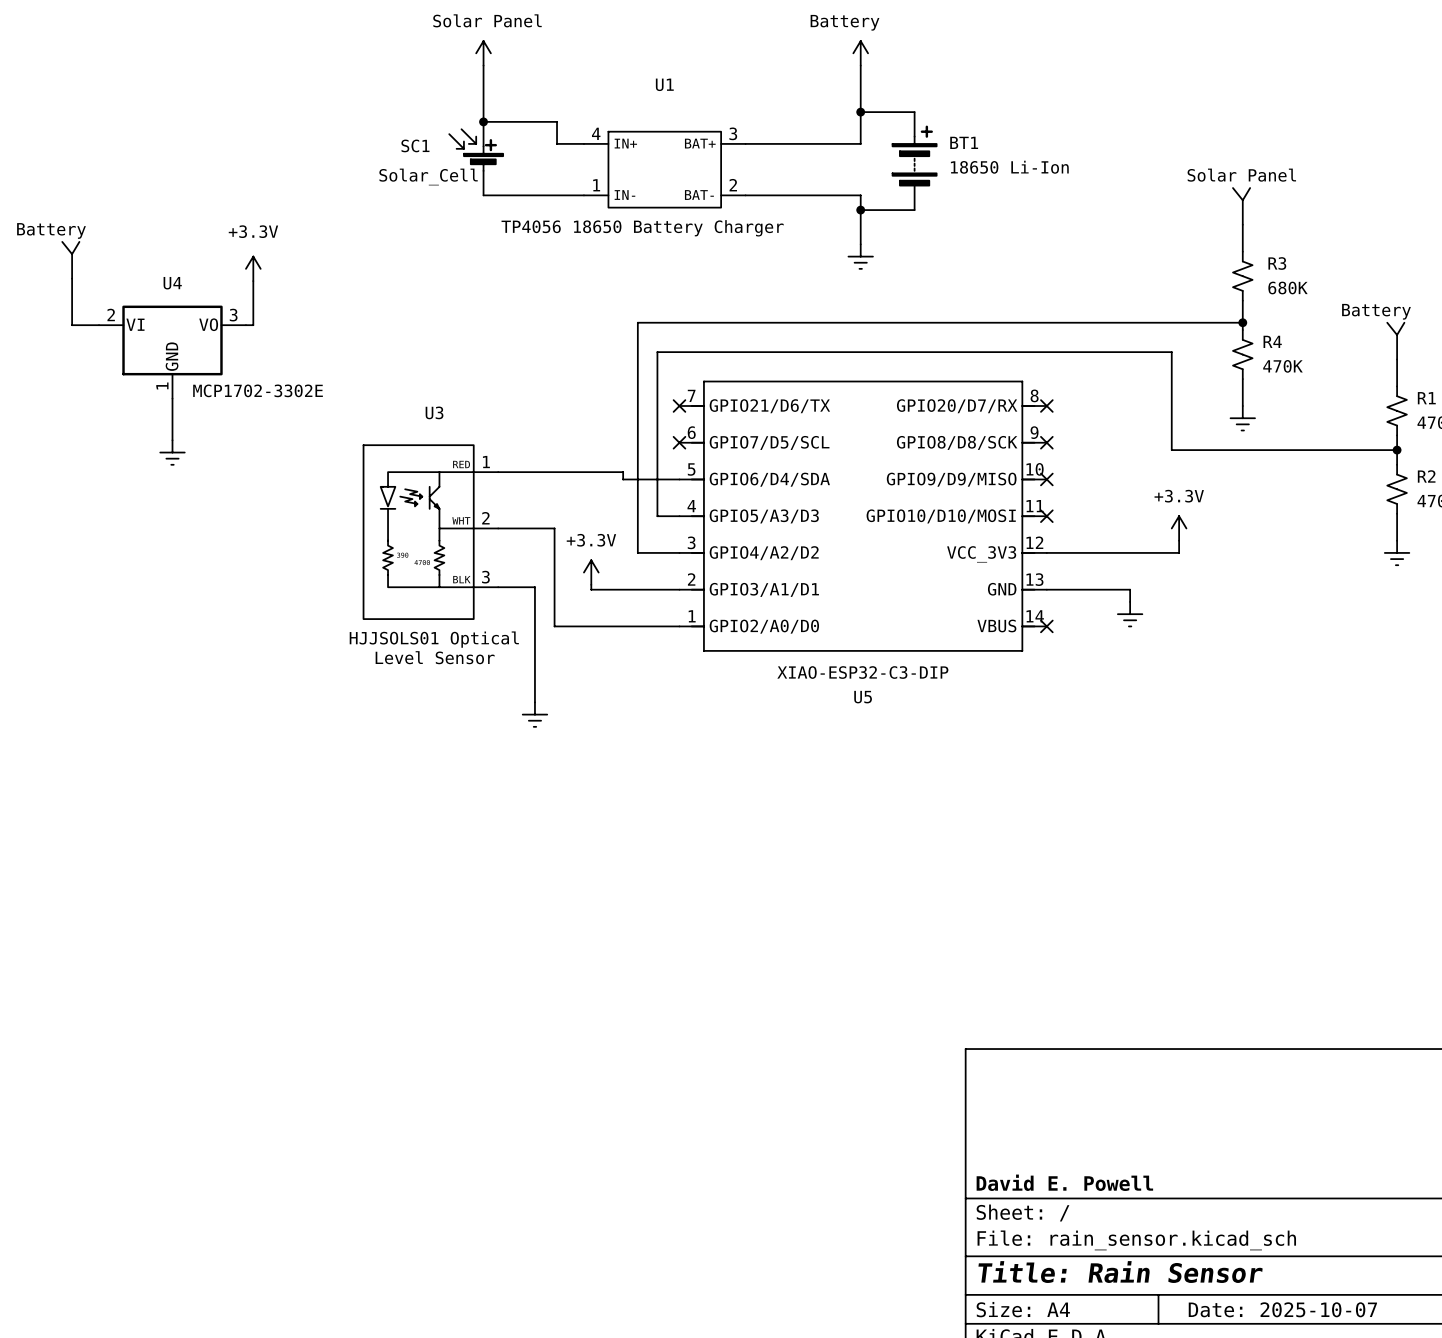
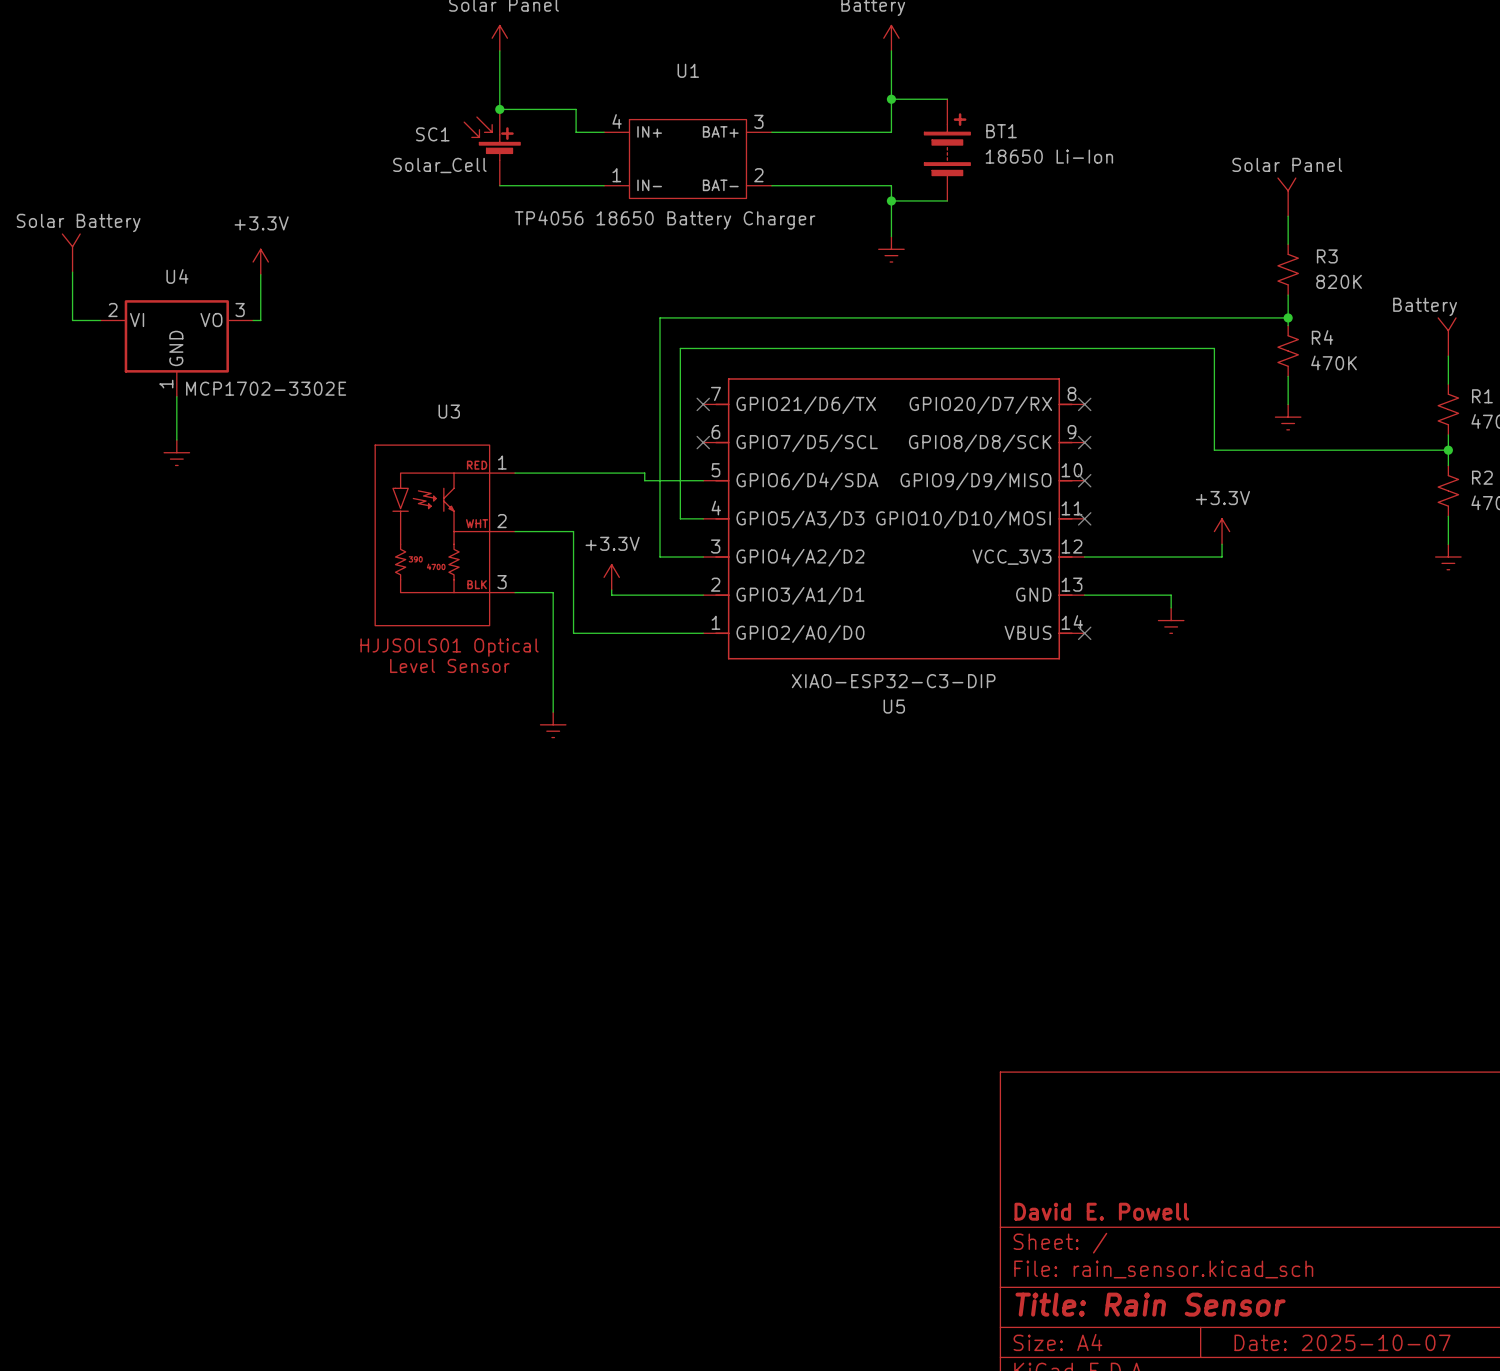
power symbol: Battery (70, 260) -> Solar Battery (71, 253)
R3 value: 680K (1288, 287) -> 820K (1339, 281)

